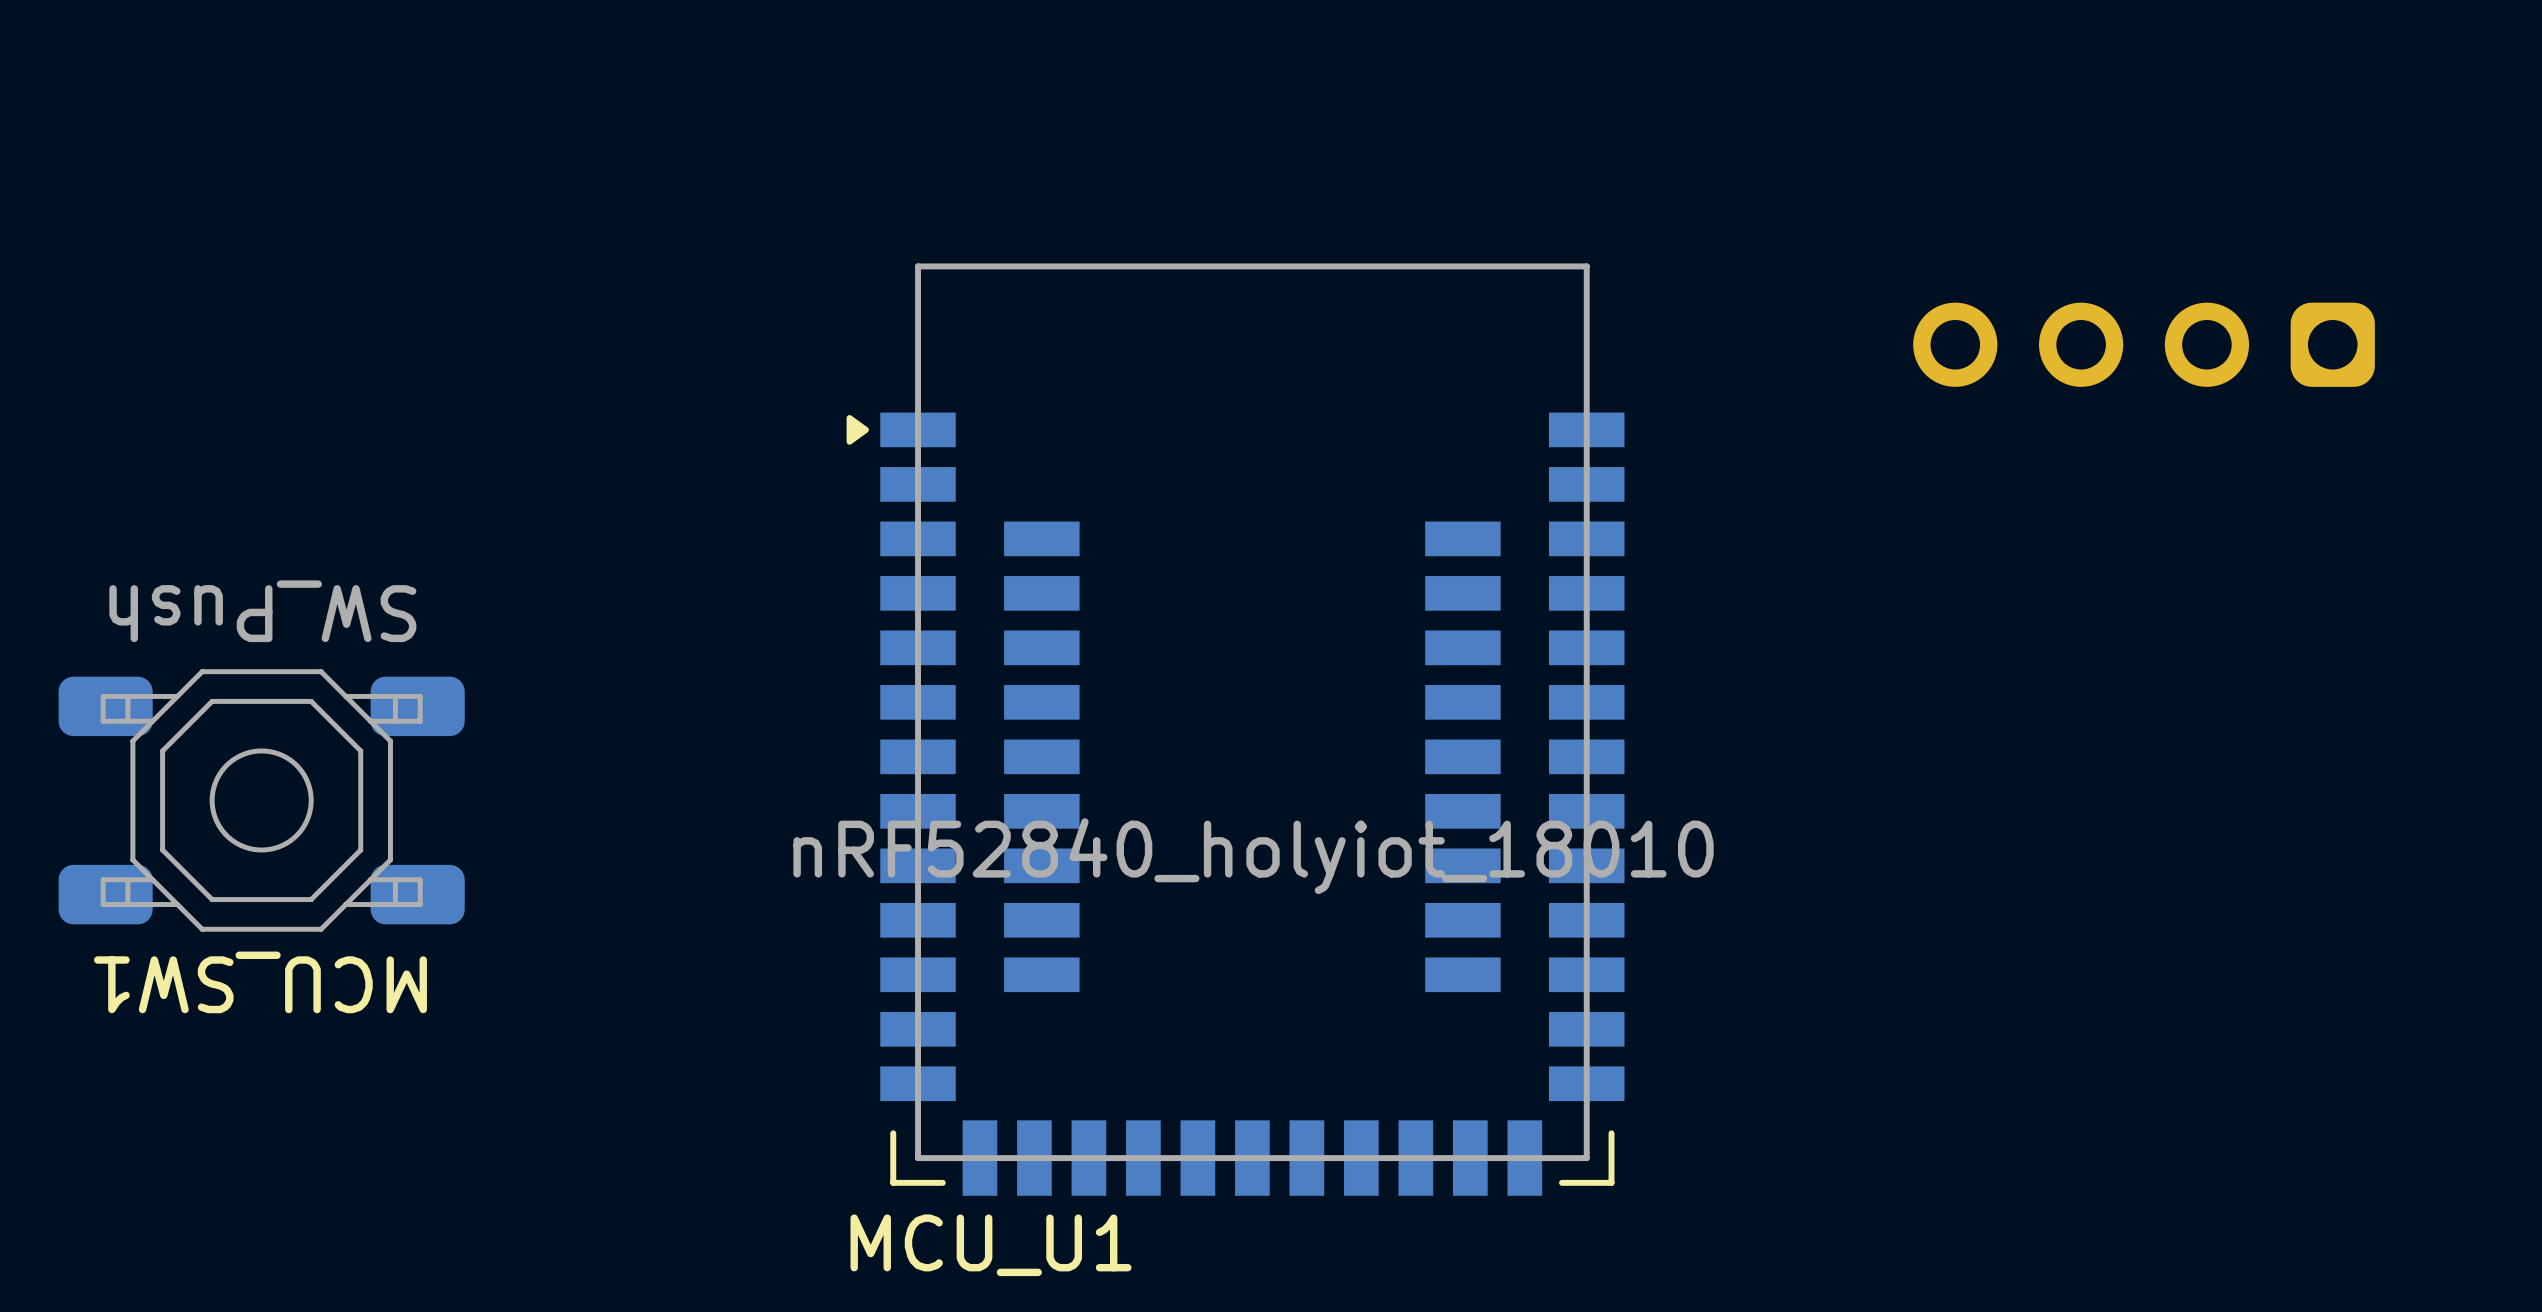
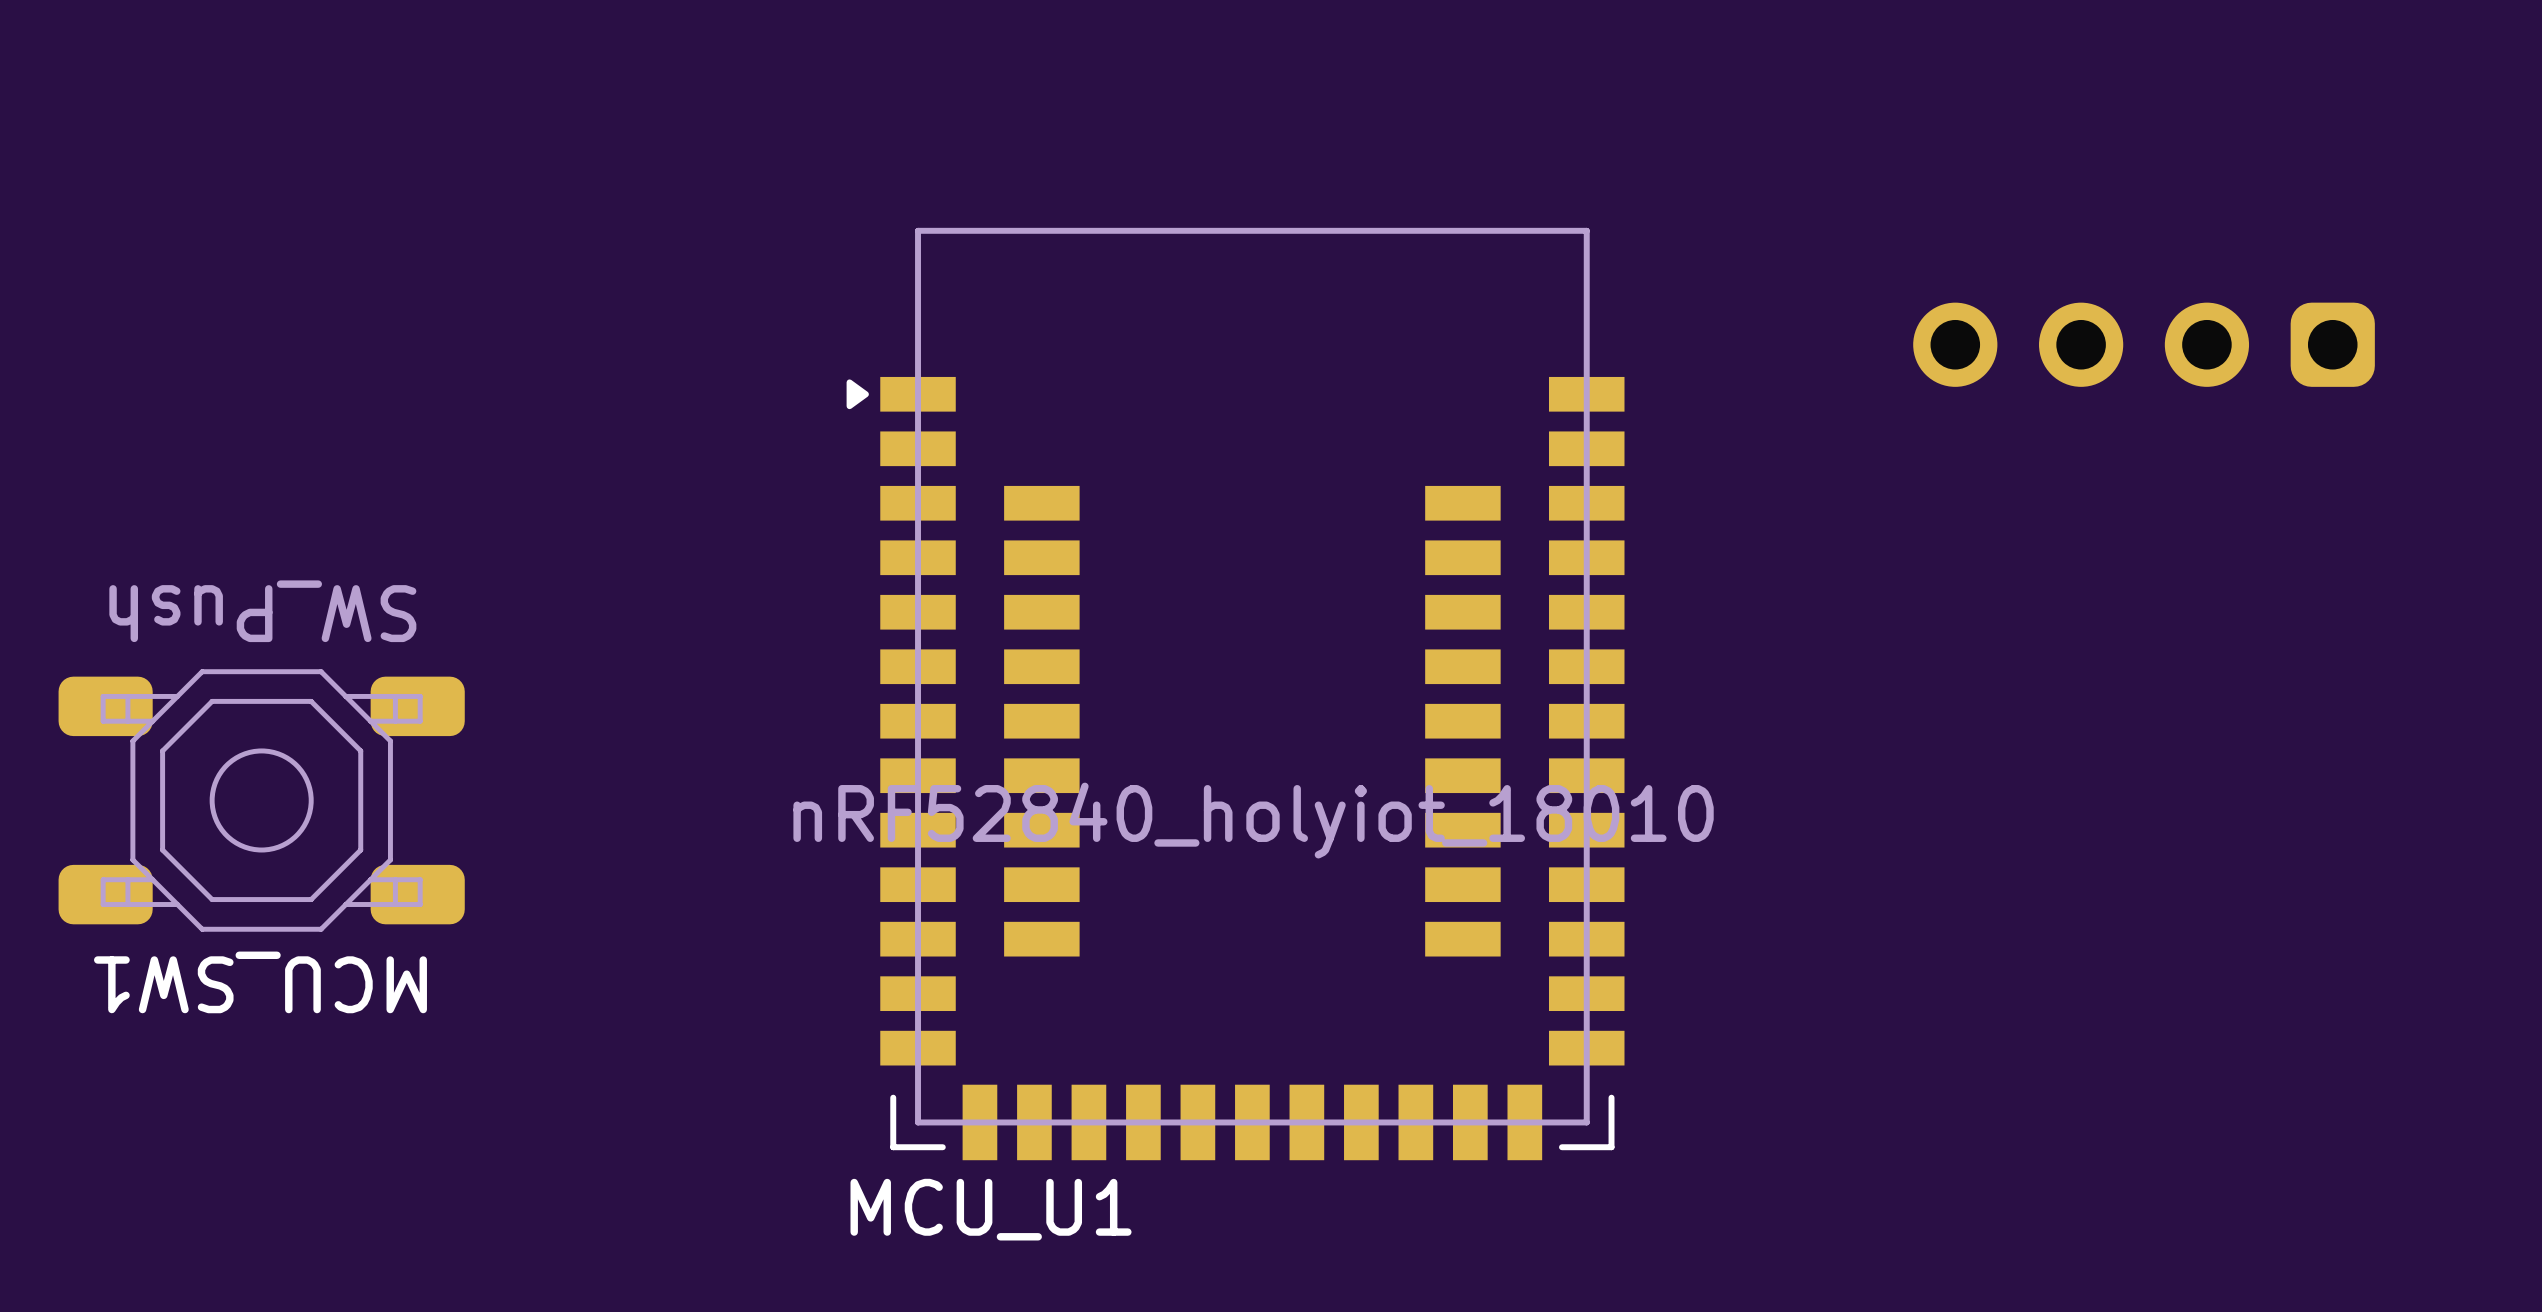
MCU_U1 position: (1235, 729) -> (1235, 694)

